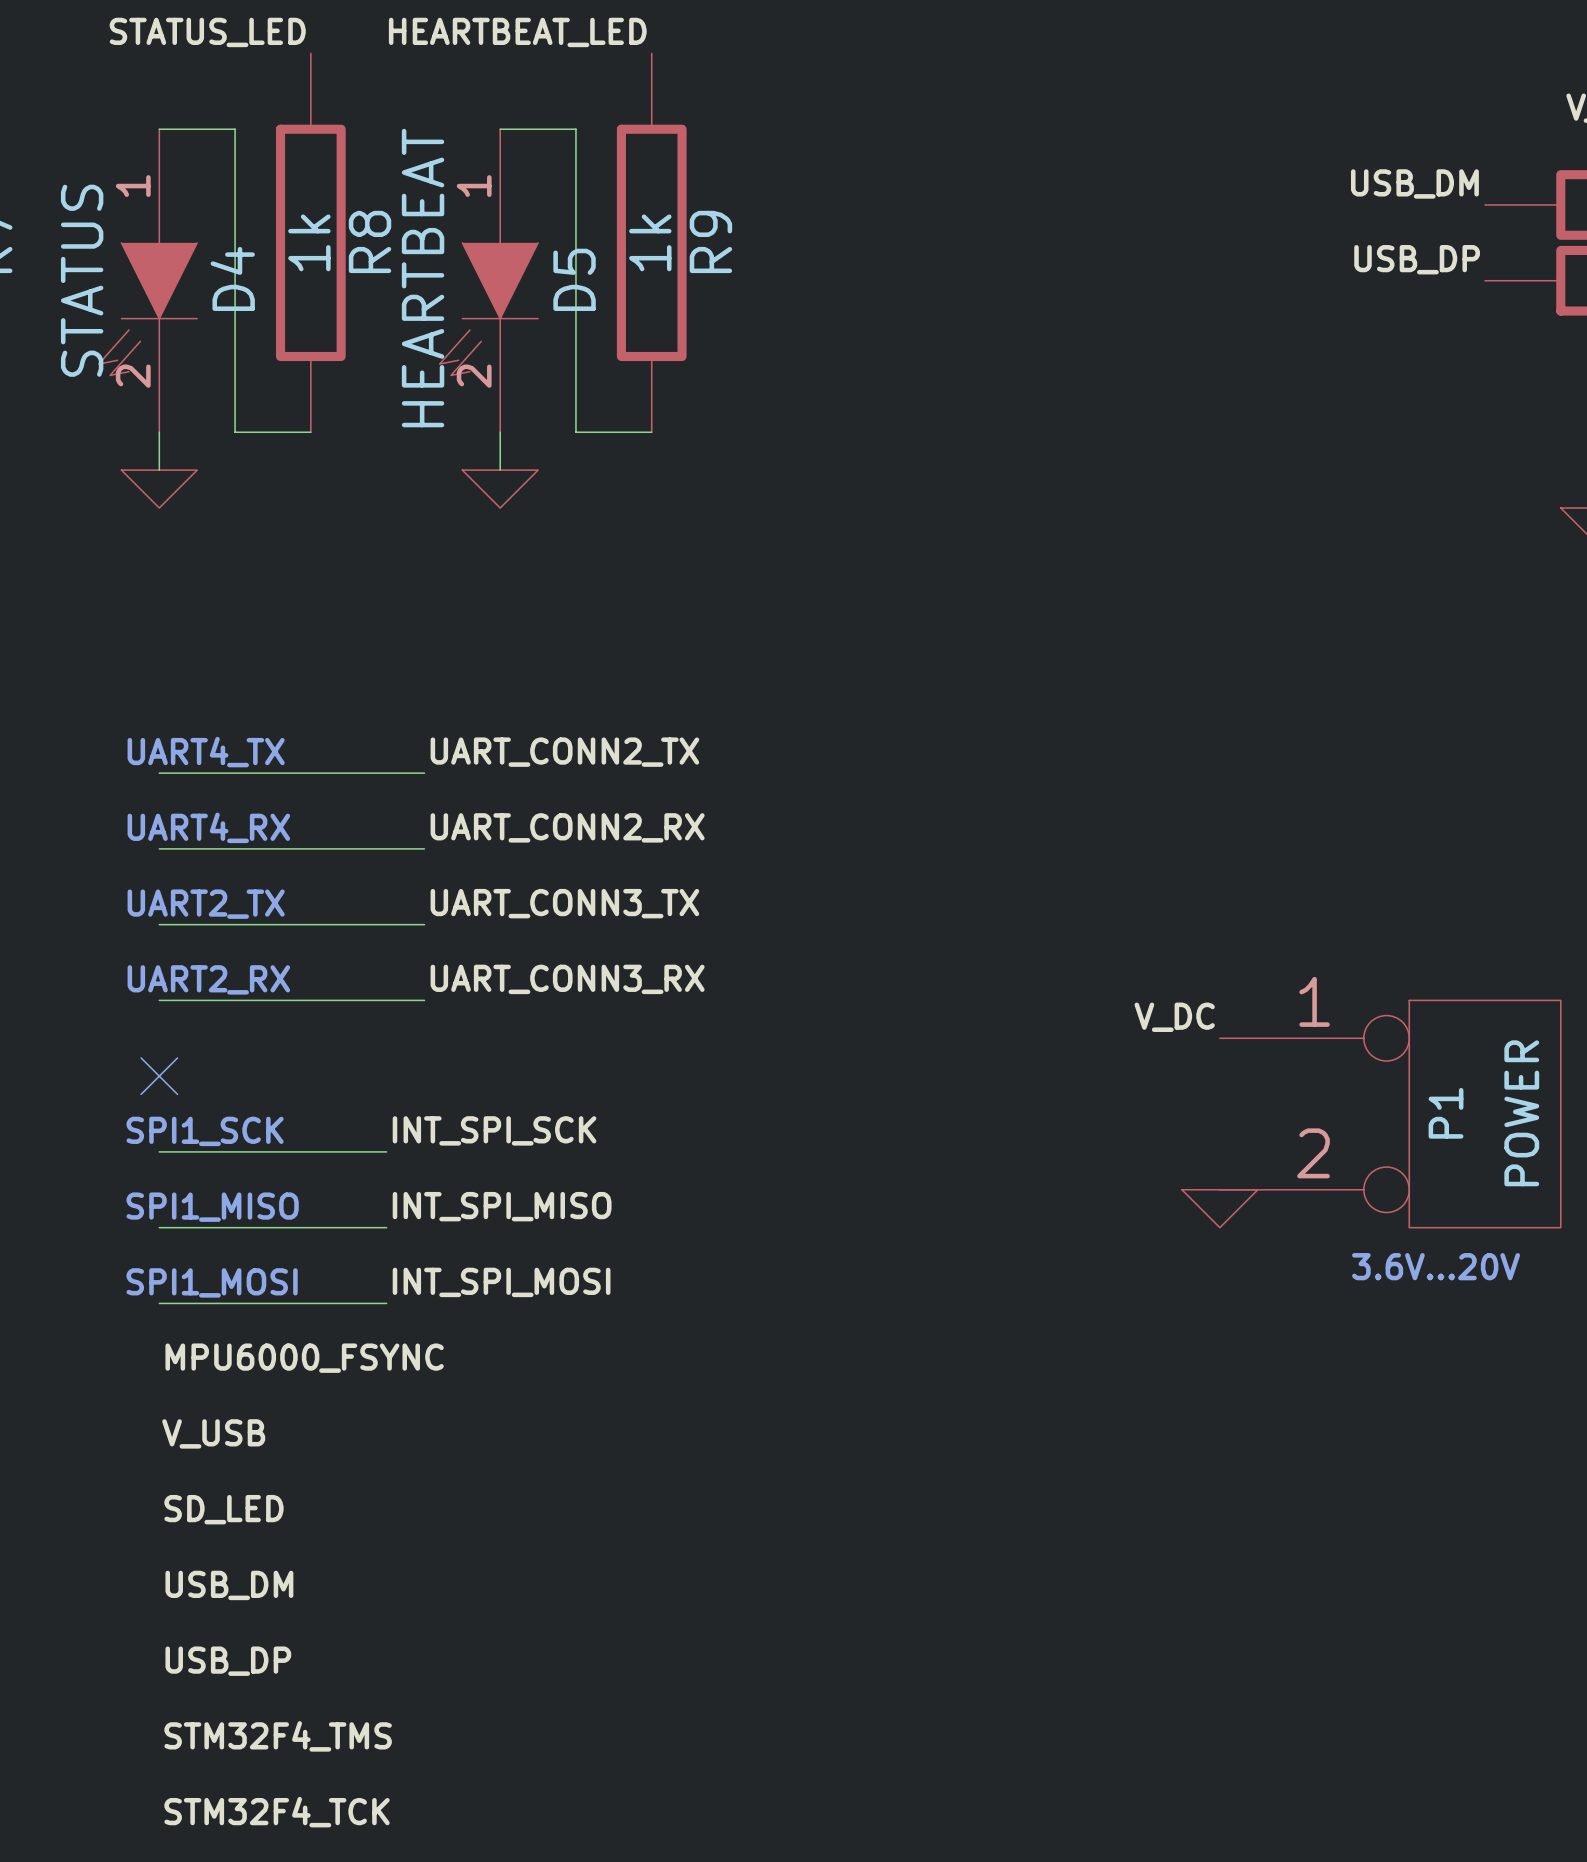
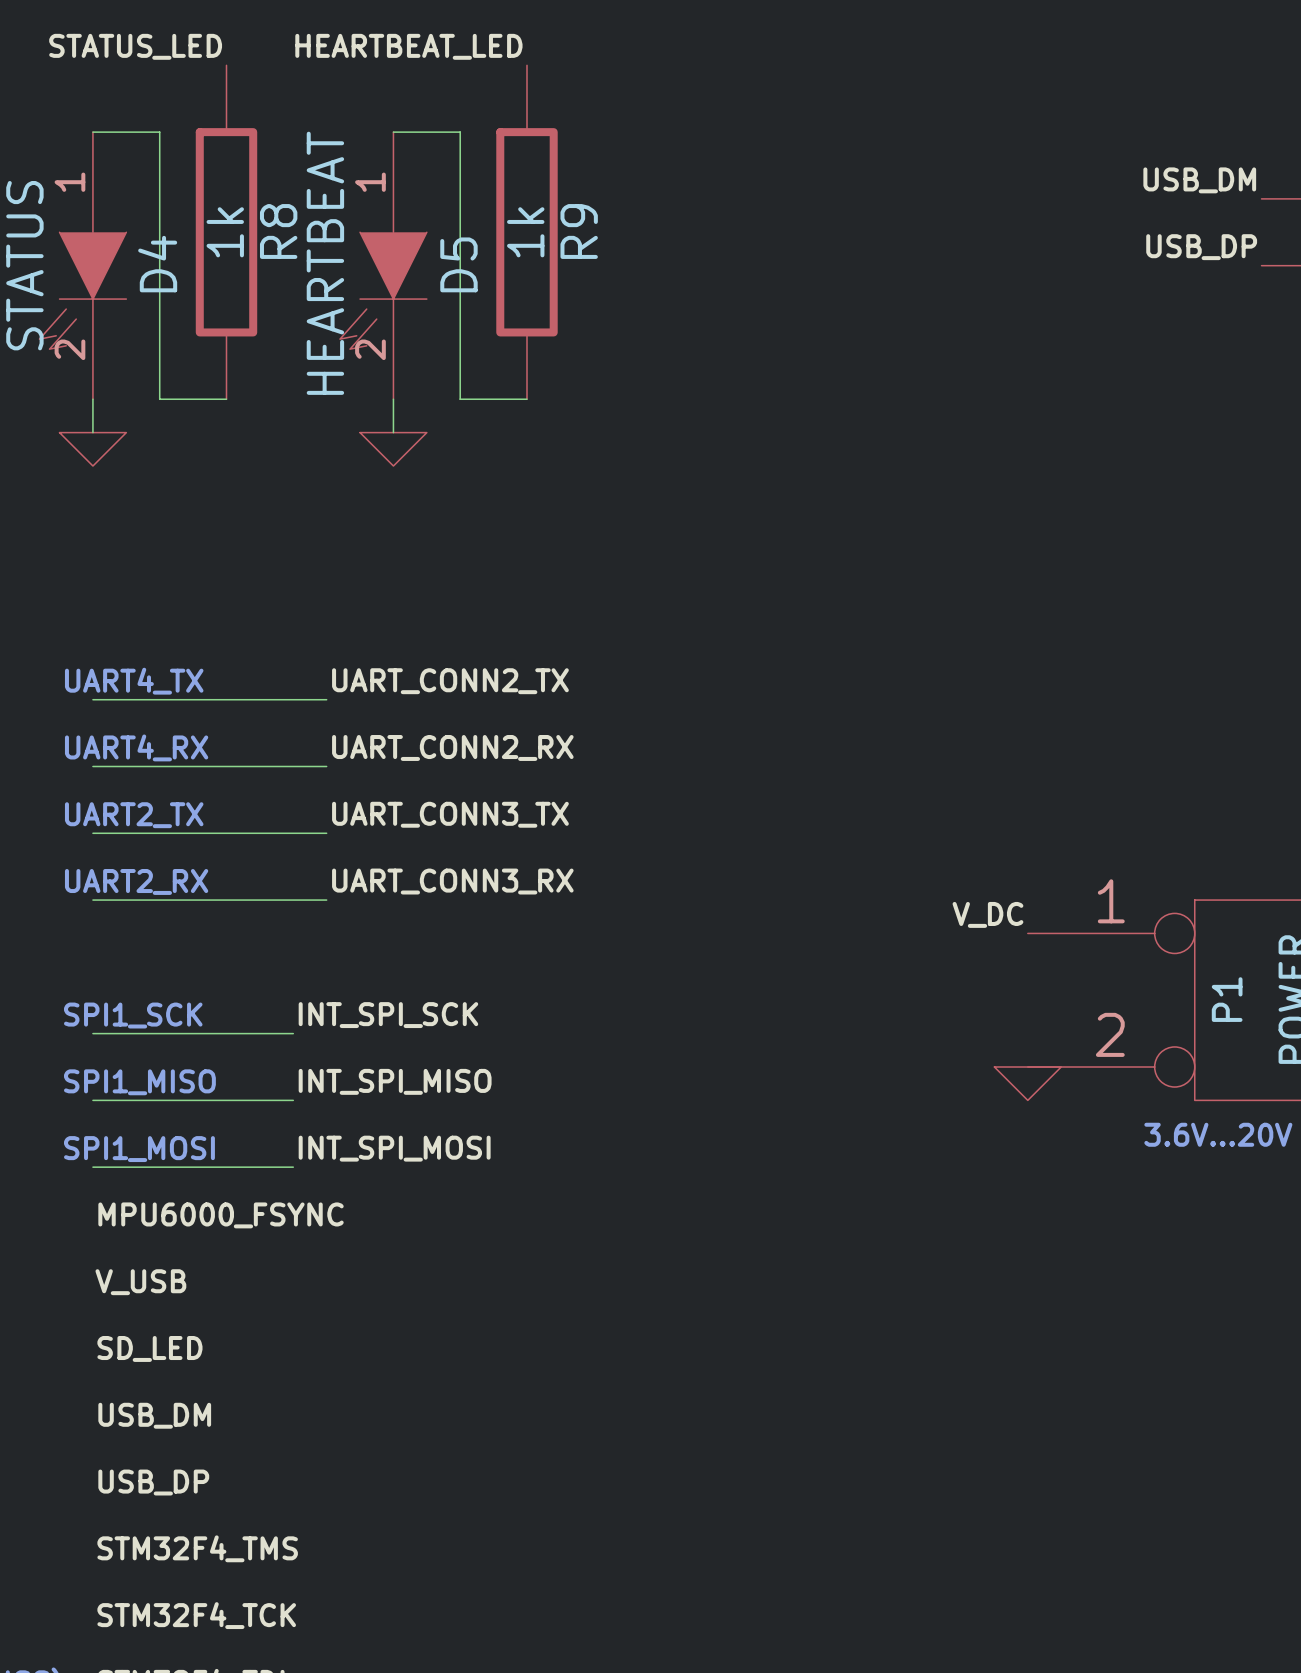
no-connect mark: (159, 1076) -> none

